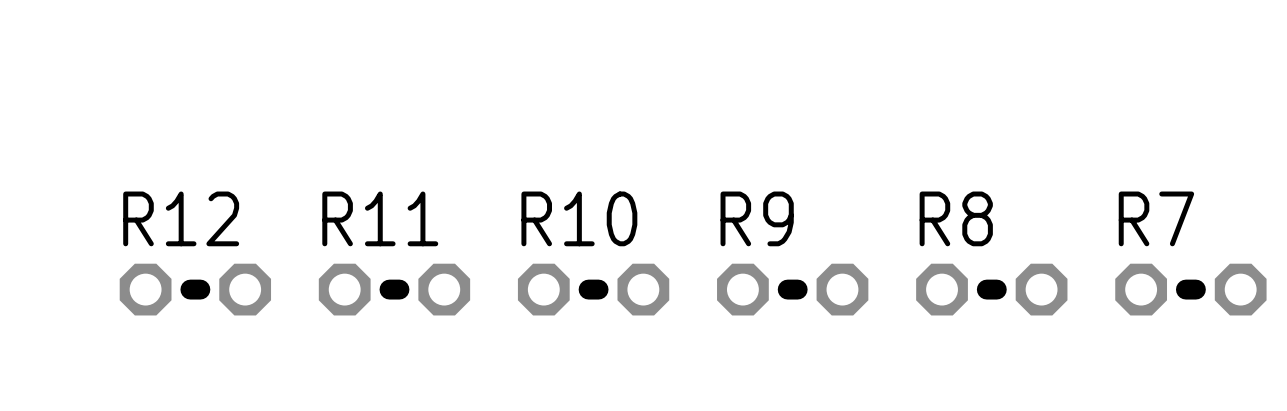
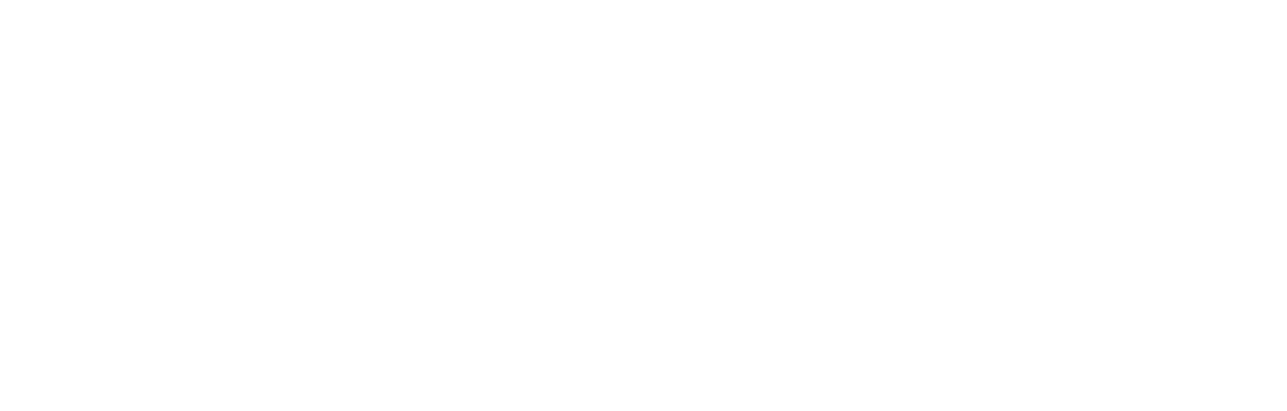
R12: (195, 289) -> none
R11: (394, 289) -> none
R10: (593, 289) -> none
R9: (792, 289) -> none
R8: (991, 289) -> none
R7: (1190, 289) -> none

